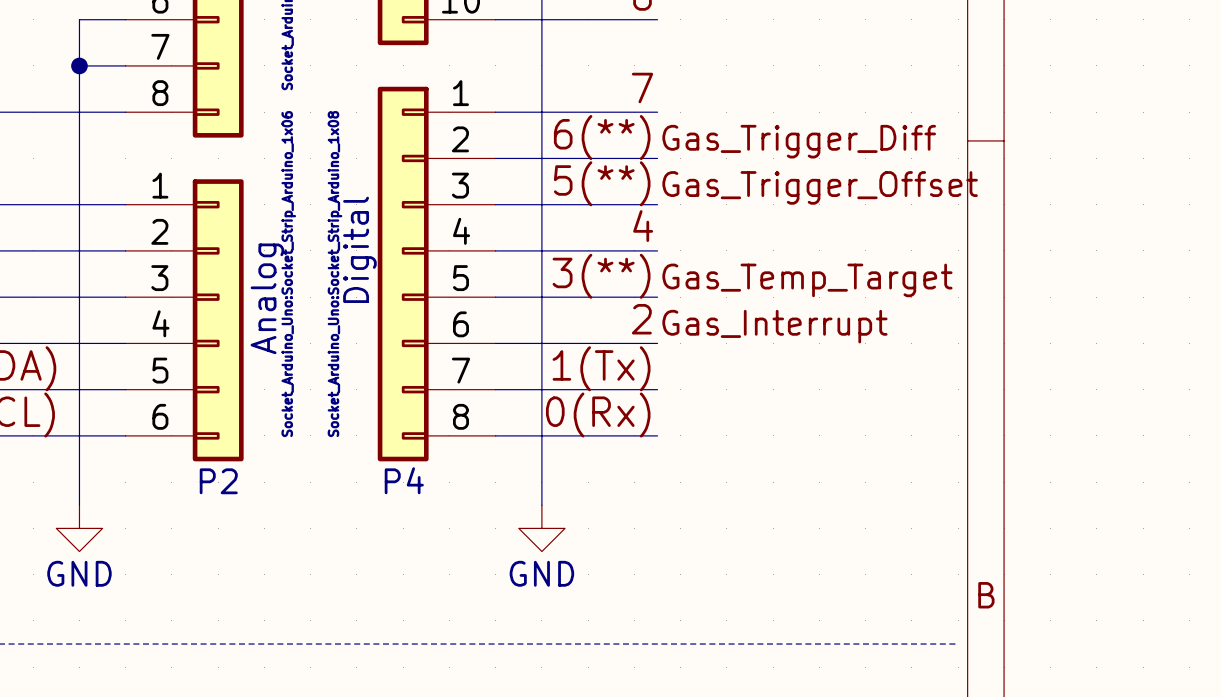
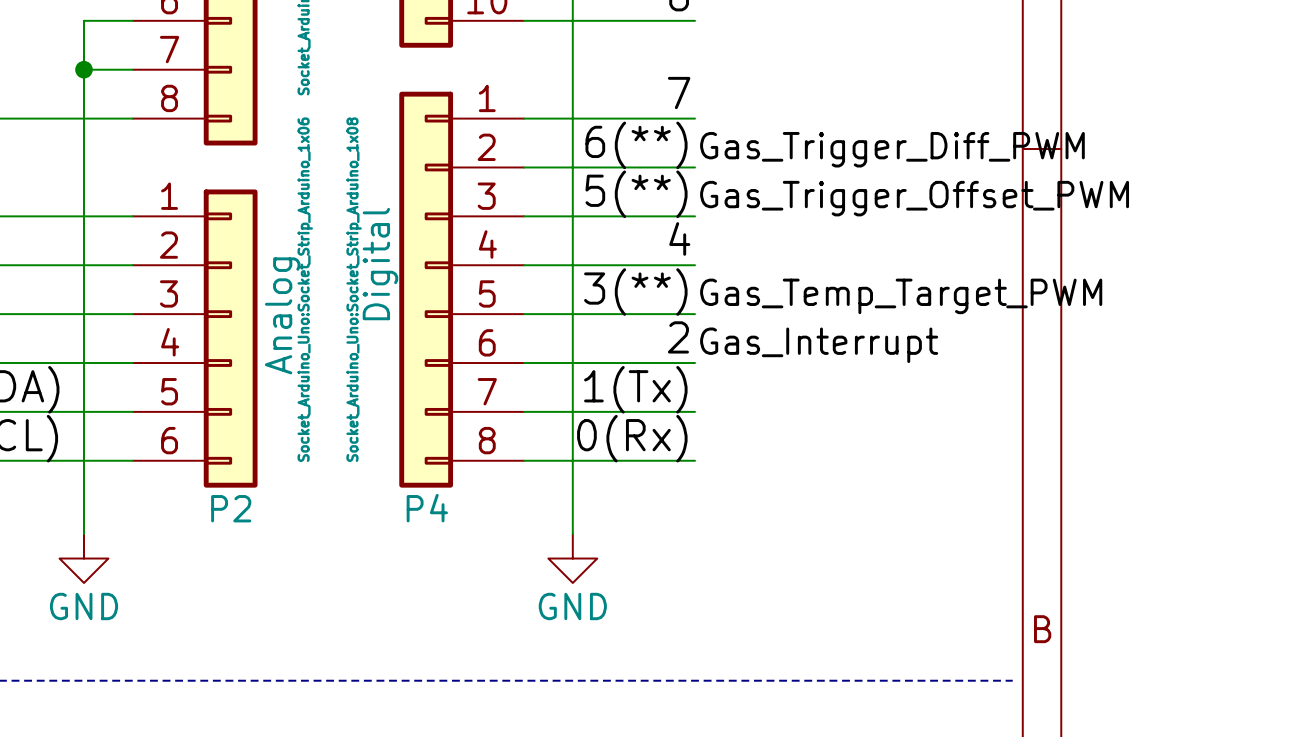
label: Gas_Trigger_Diff (799, 141) -> Gas_Trigger_Diff_PWM (892, 149)
label: Gas_Trigger_Offset (820, 187) -> Gas_Trigger_Offset_PWM (914, 198)
label: Gas_Temp_Target (807, 280) -> Gas_Temp_Target_PWM (901, 296)

